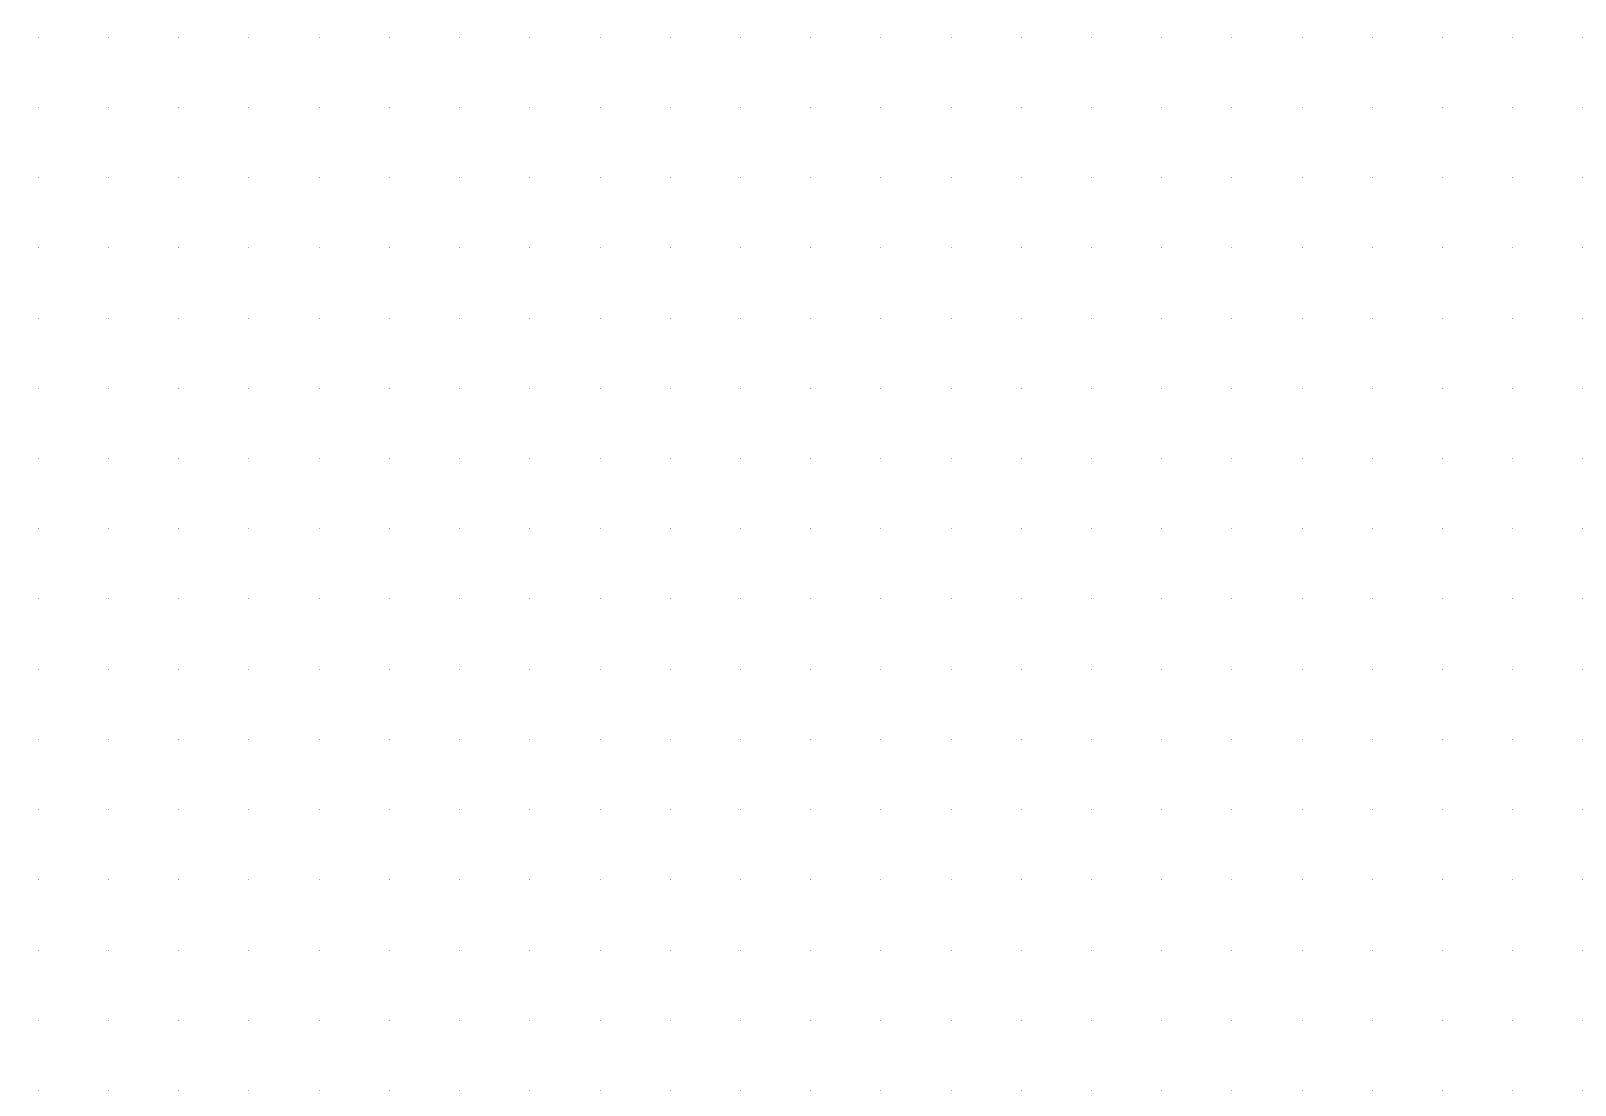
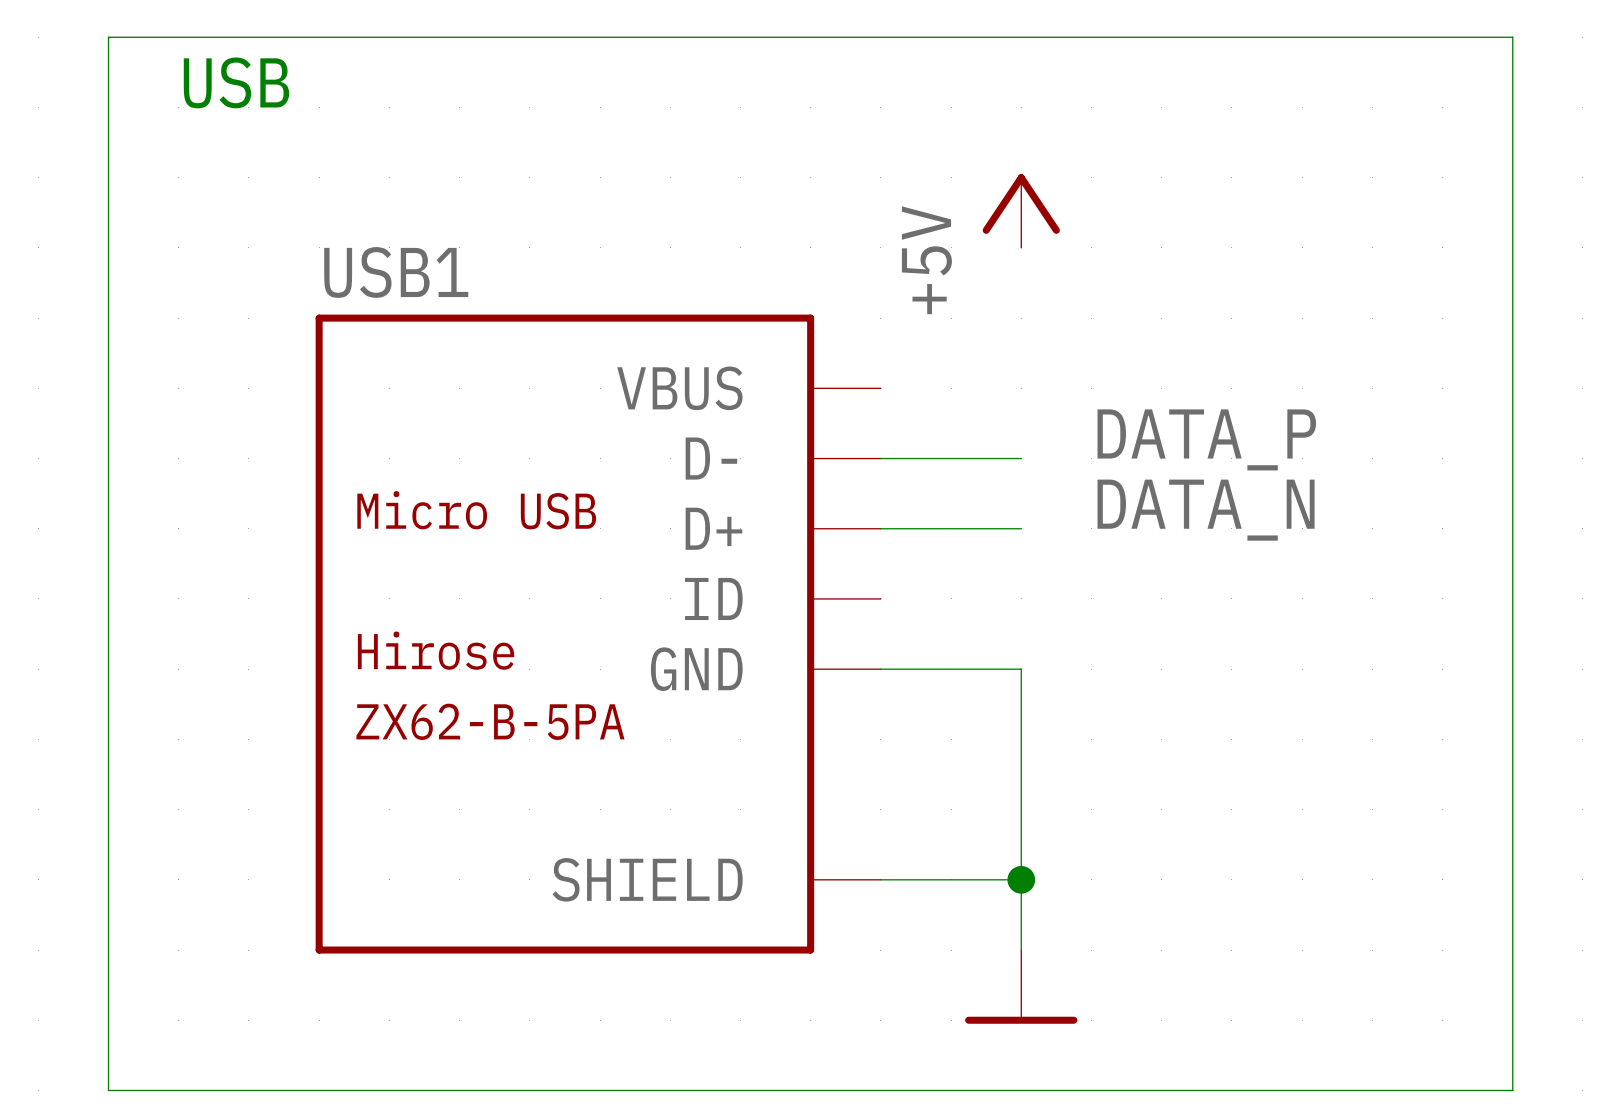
wire: none -> (108, 37) (1512, 37) (1512, 1090) (108, 1090) (108, 37)
text: none -> USB (236, 82)
power symbol: none -> +5V (1021, 211)
label: none -> DATA_P (1206, 439)
wire: none -> (880, 458) (1021, 458)
label: none -> DATA_N (1206, 510)
wire: none -> (880, 528) (1021, 528)
USB1: none -> (598, 634)
wire: none -> (880, 669) (1021, 669) (1021, 950)
wire: none -> (880, 879) (1021, 879)
junction: none -> (1021, 879)
power symbol: none -> (1021, 986)

